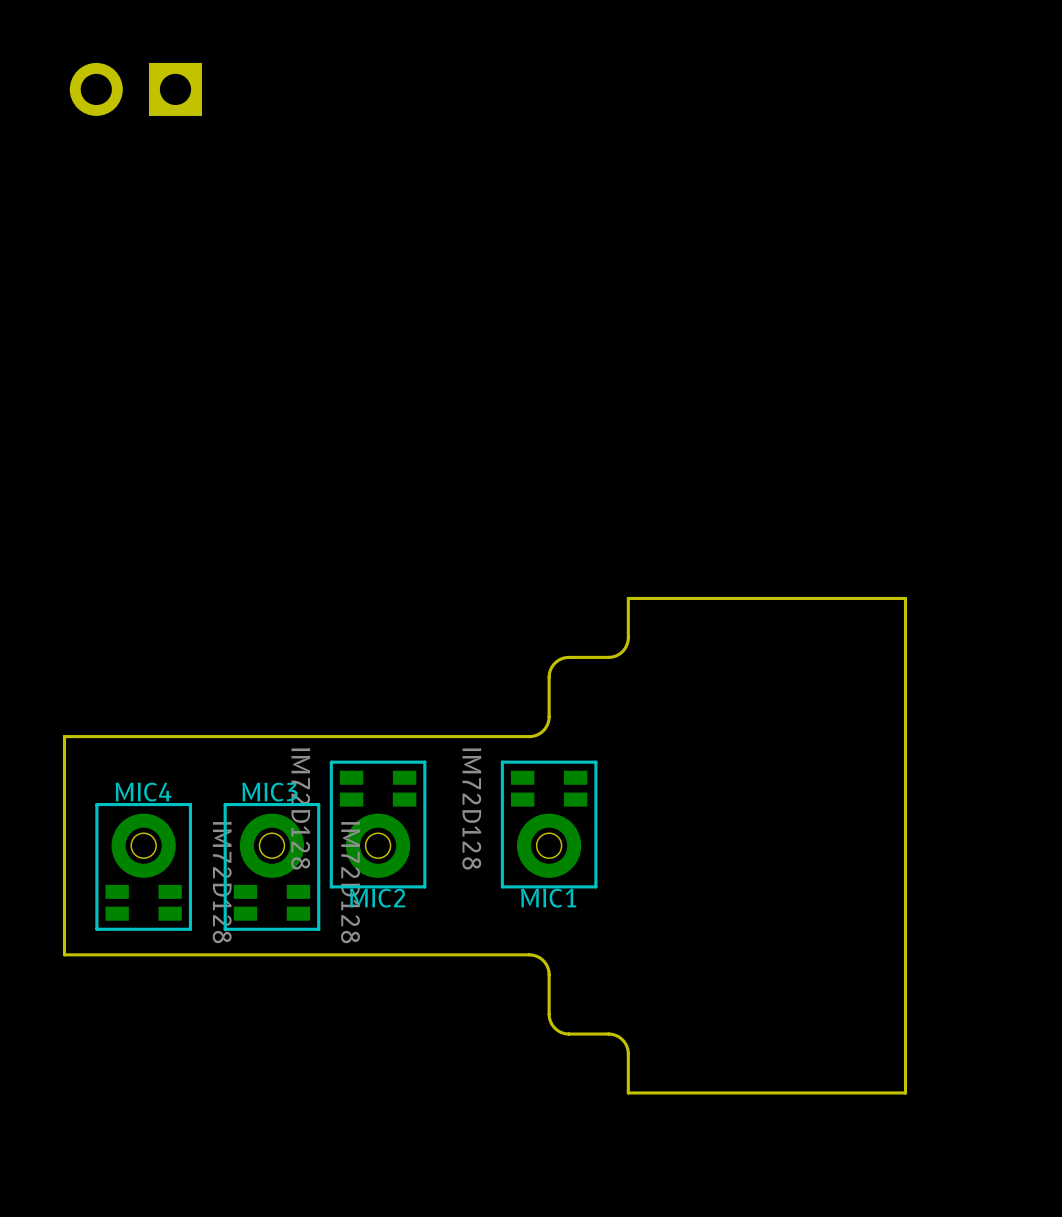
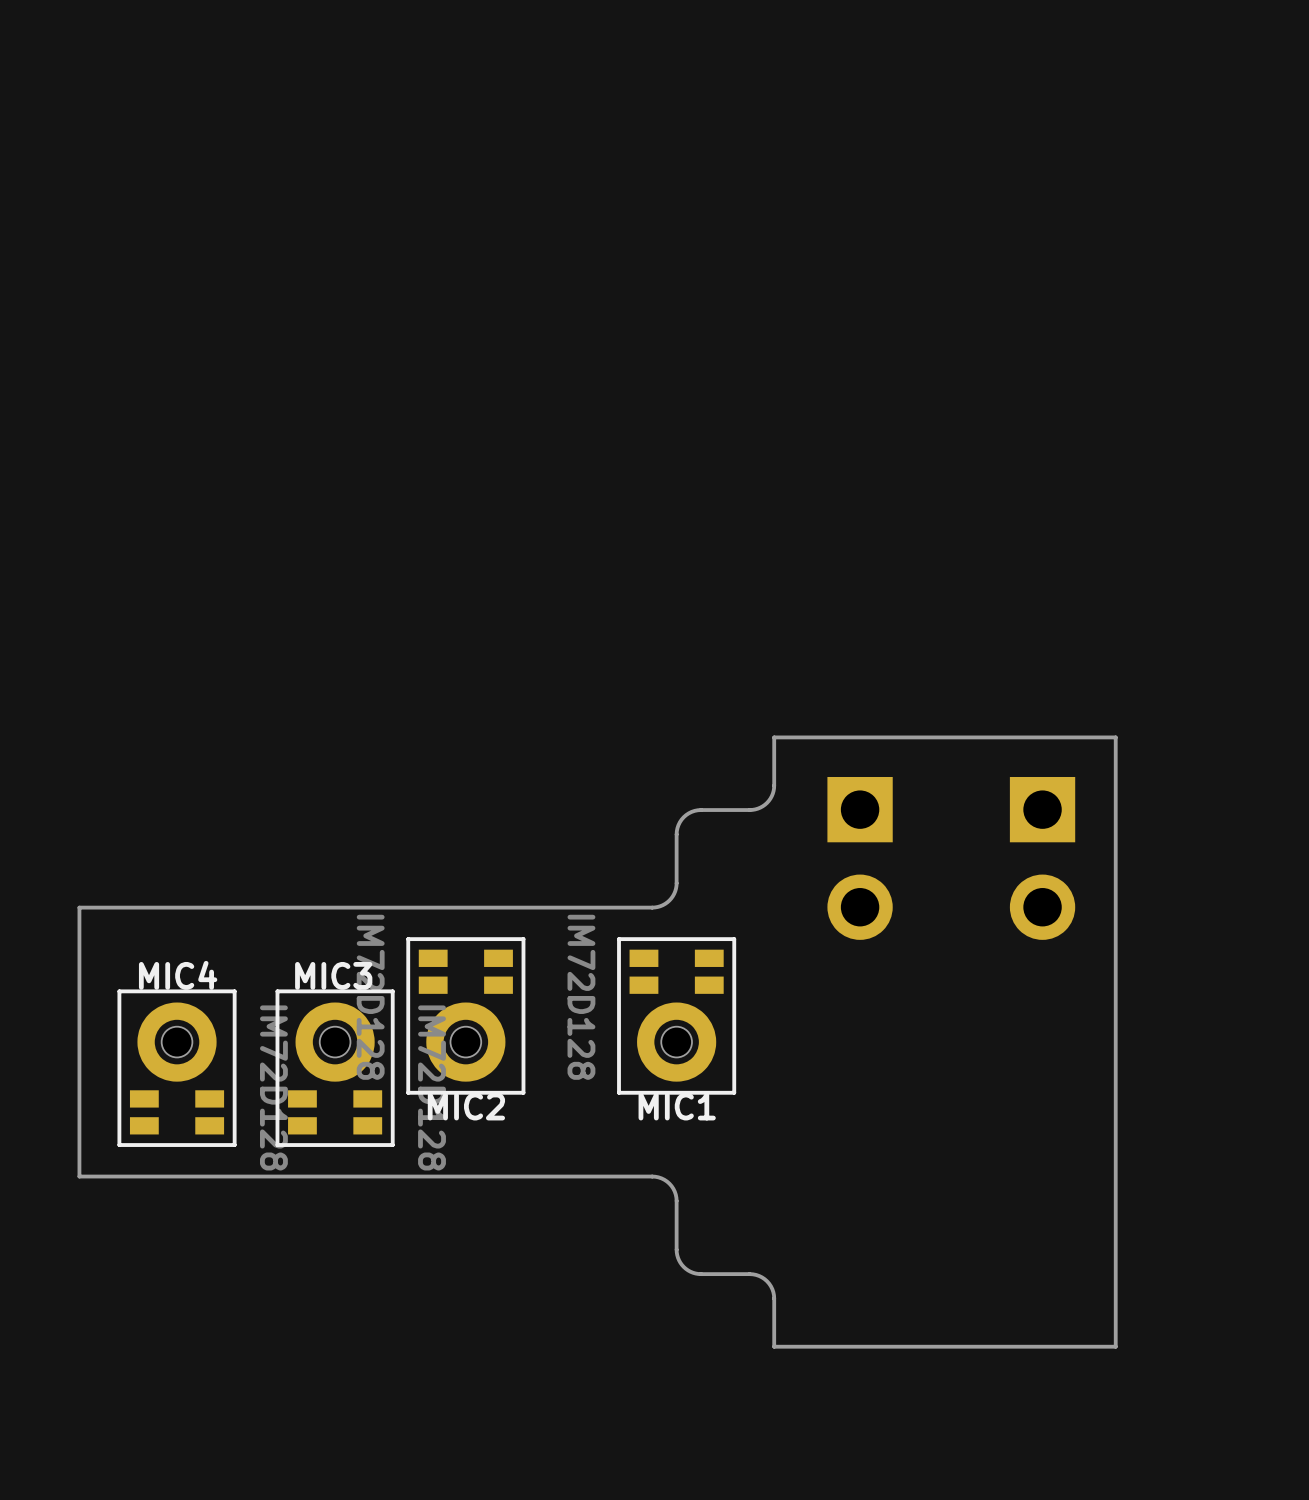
part: (135, 89) -> none
part: none -> (860, 858)
part: none -> (1042, 858)

